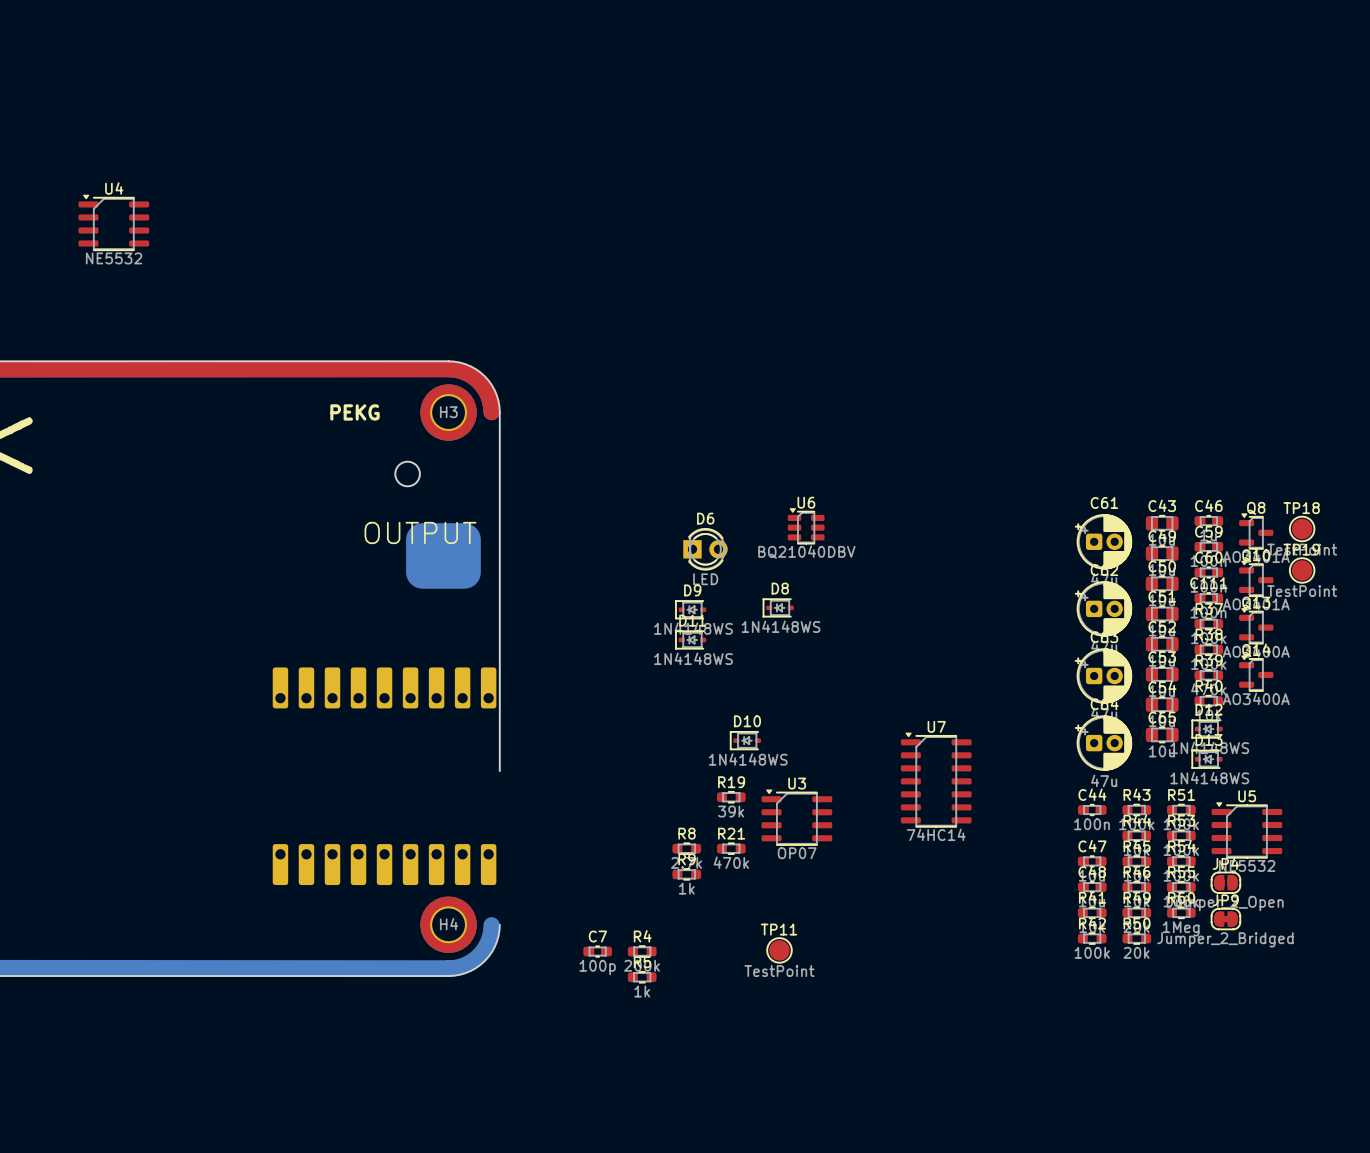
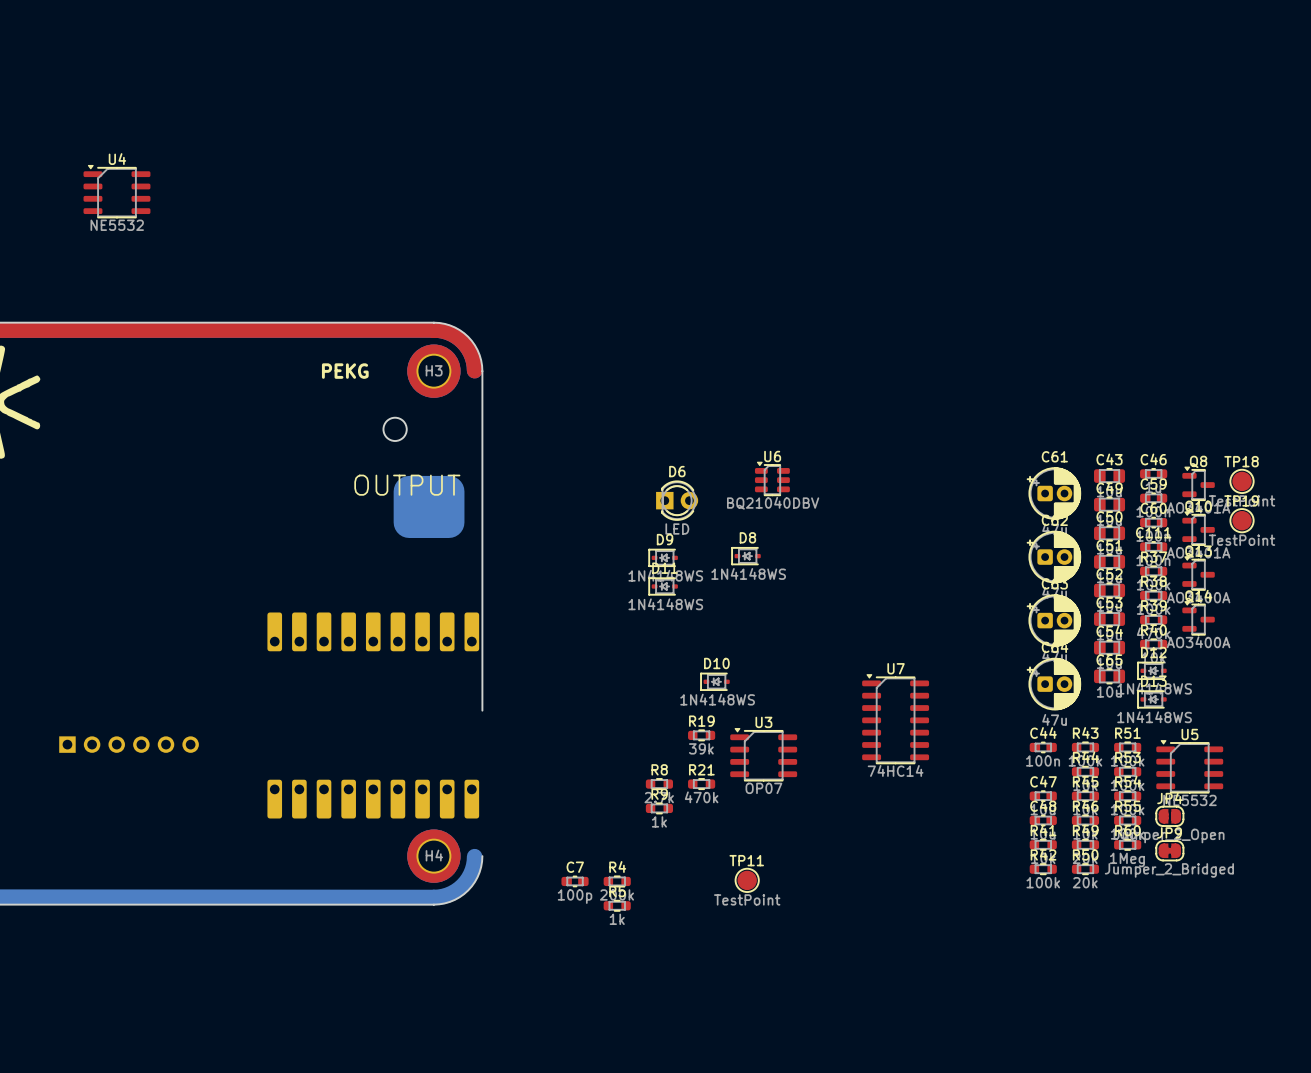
part: none -> (129, 744)

